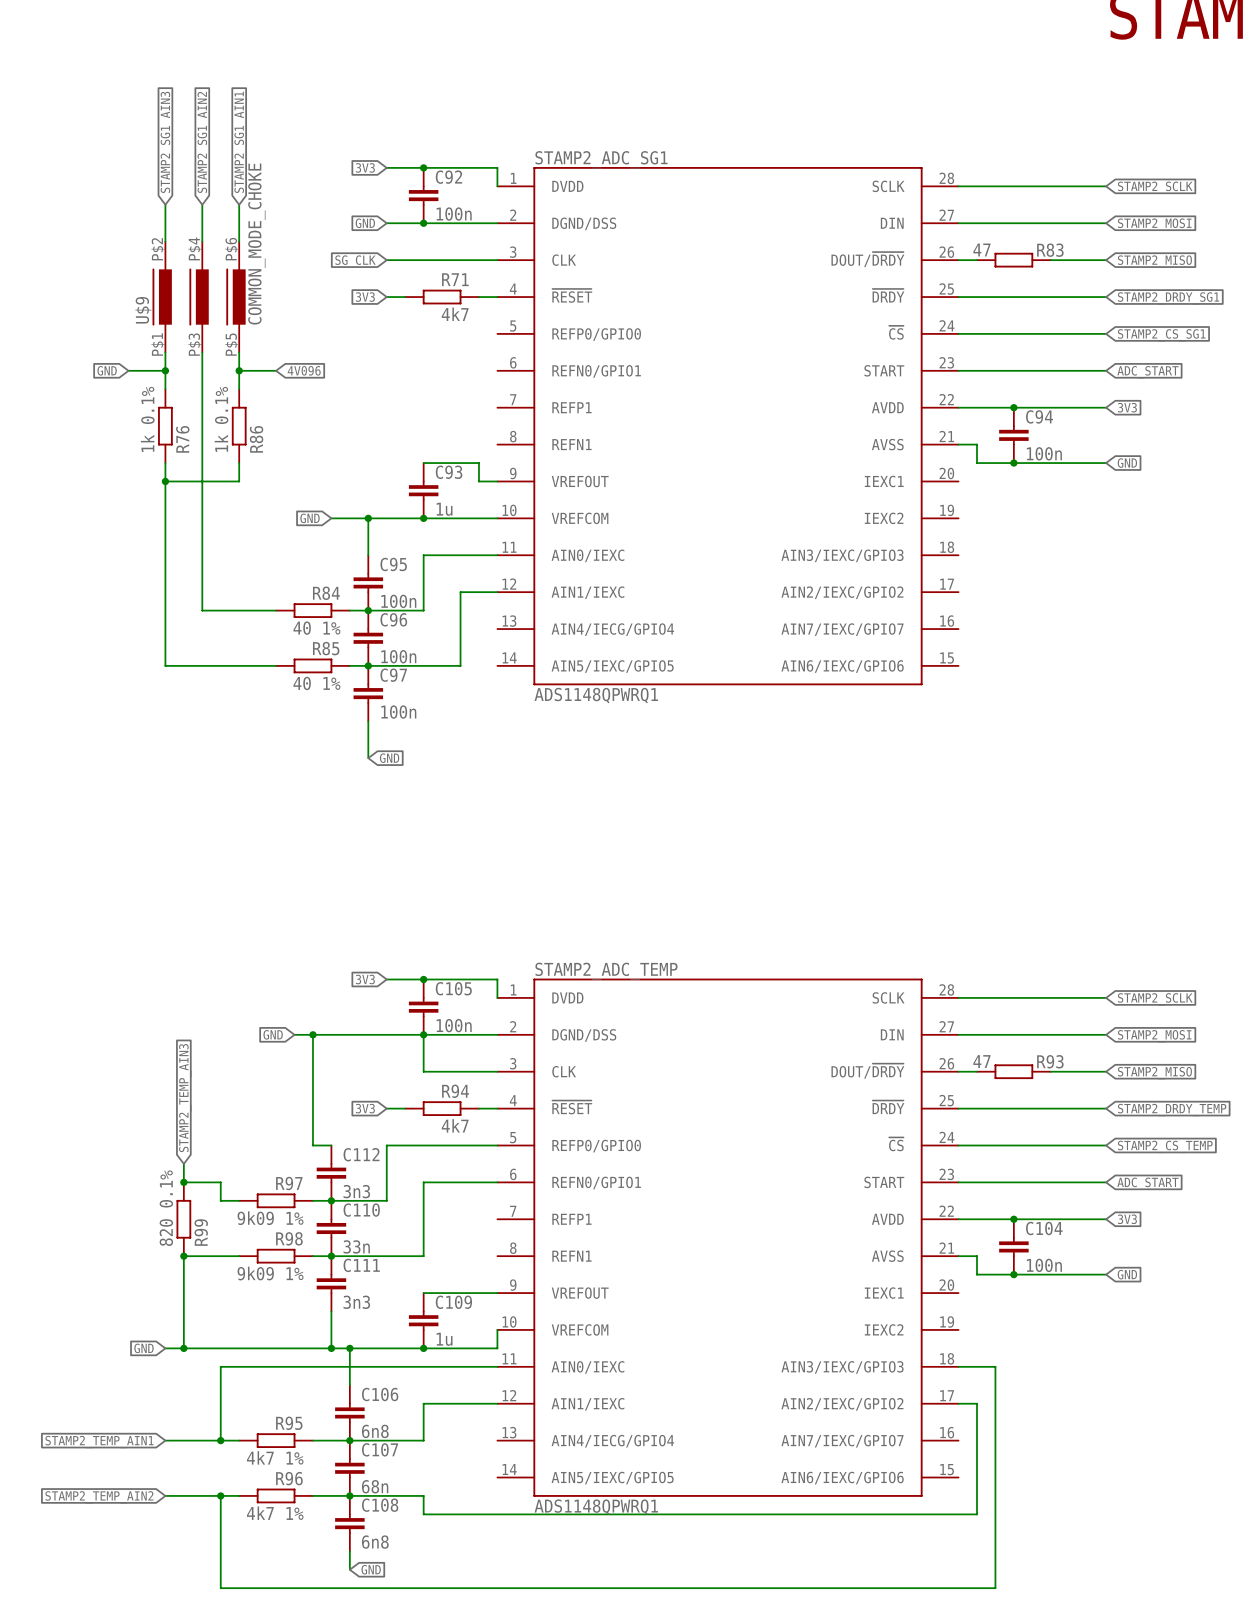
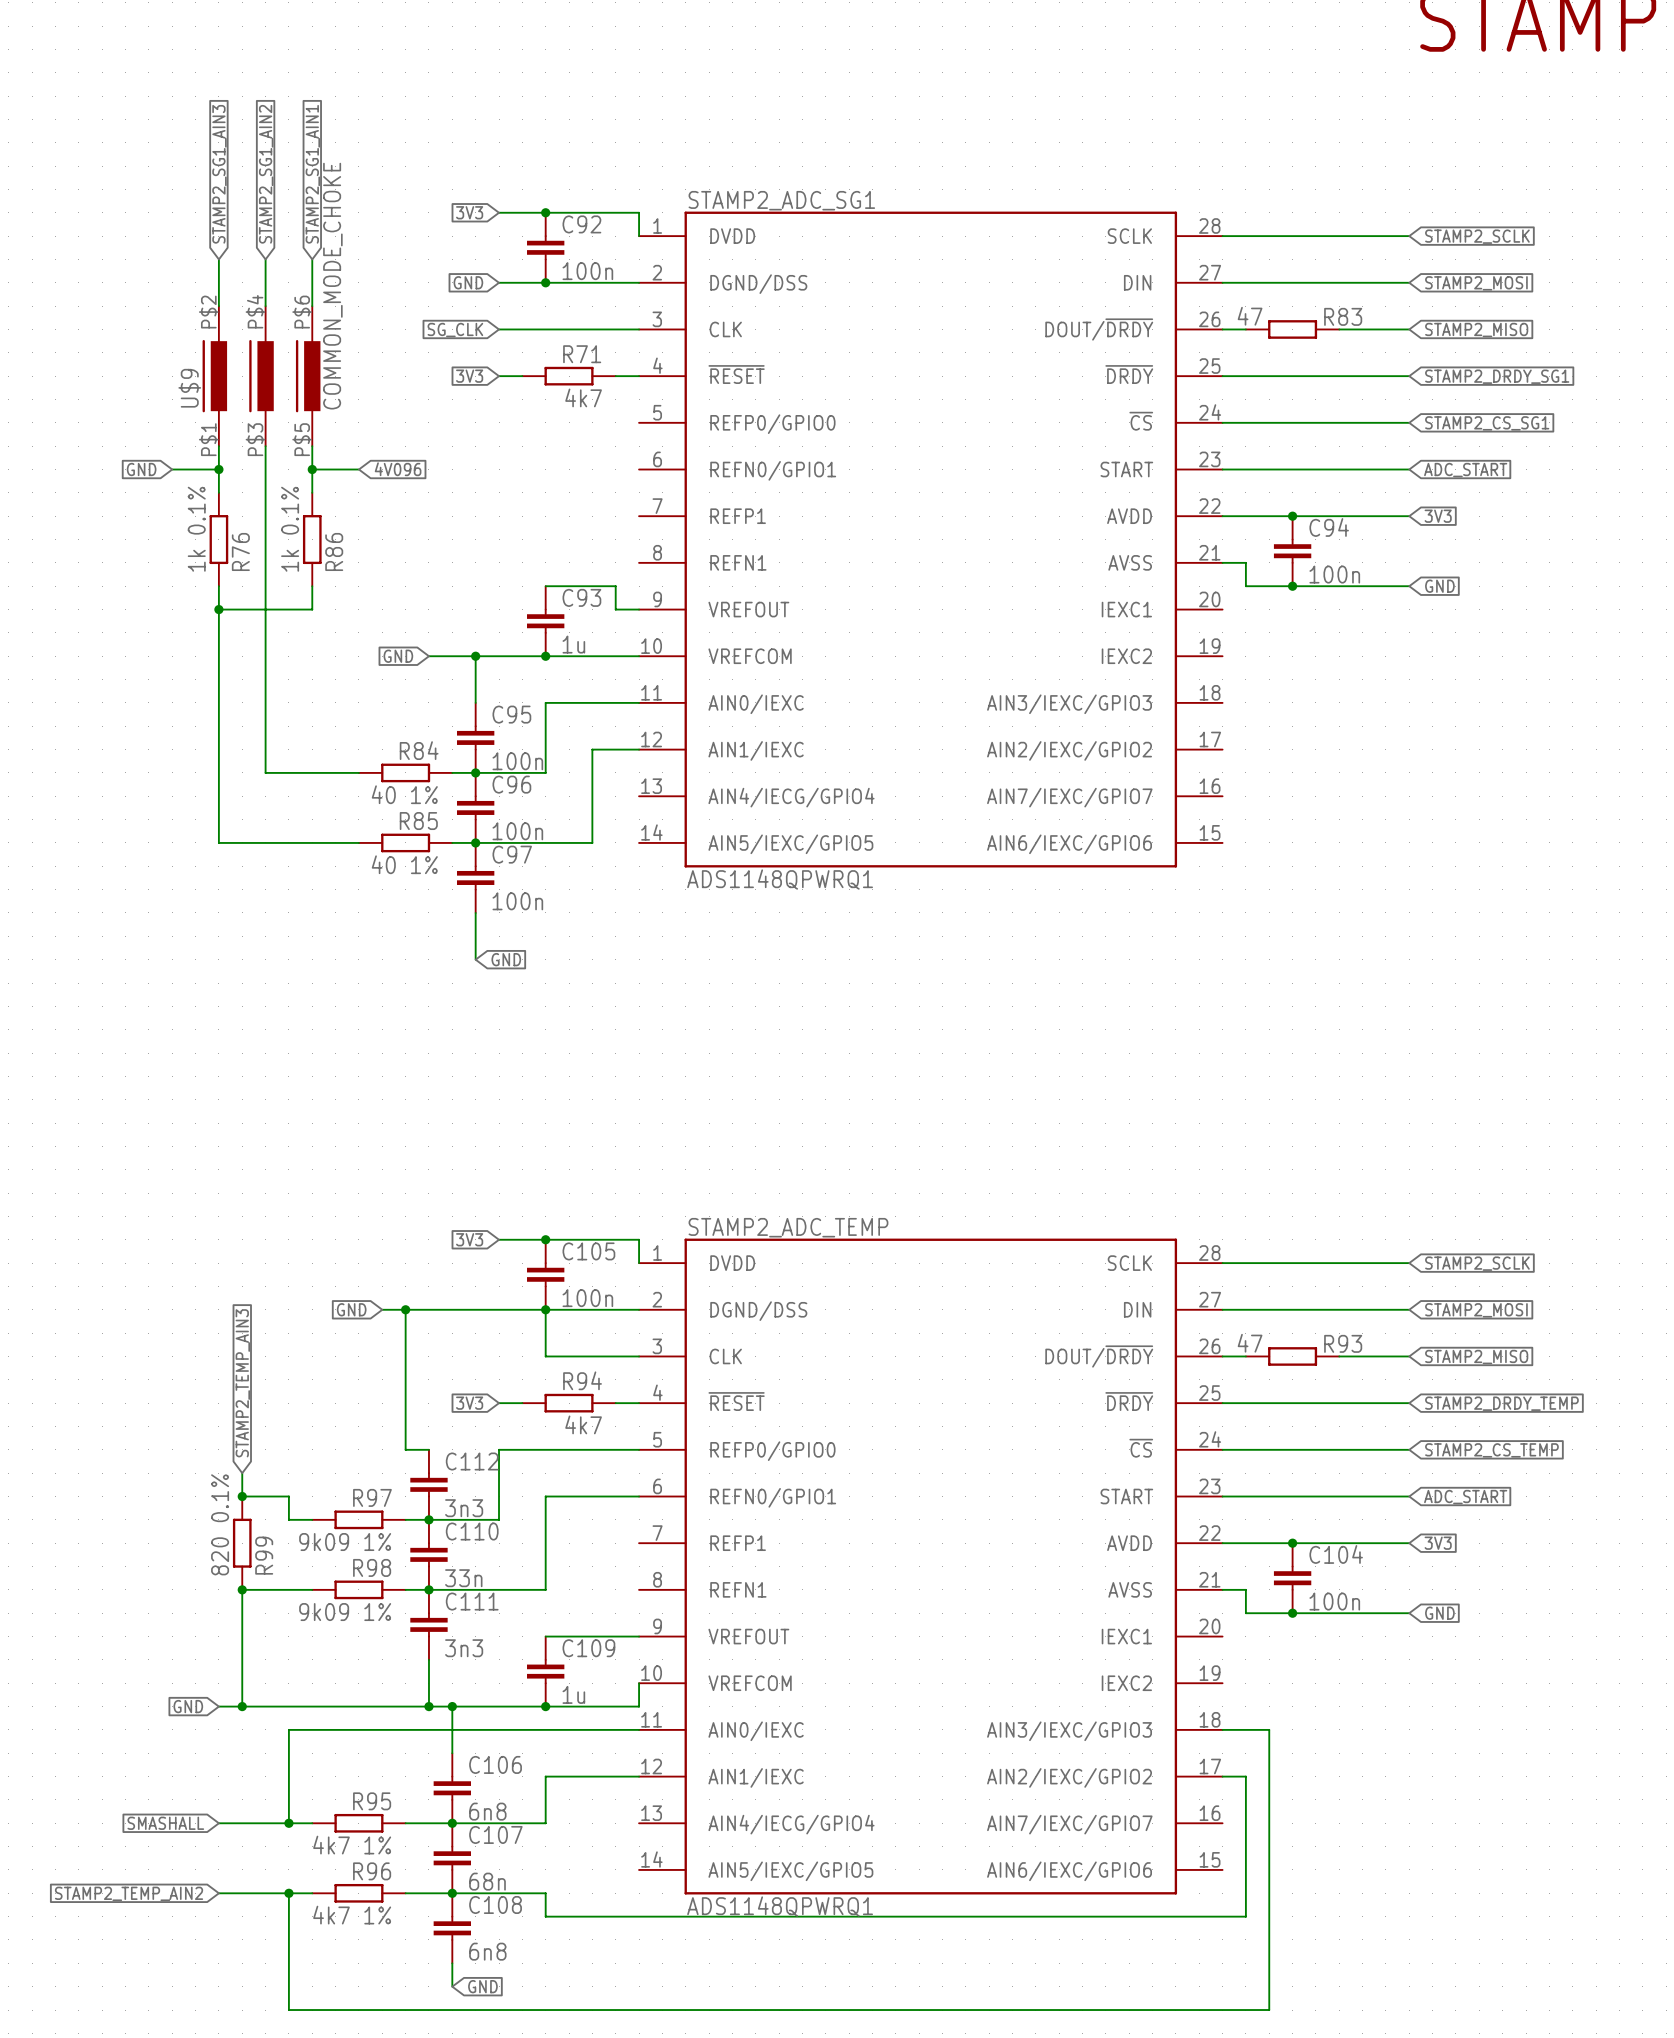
global label: STAMP2_TEMP_AIN1 (99, 1442) -> SMASHALL (165, 1823)

